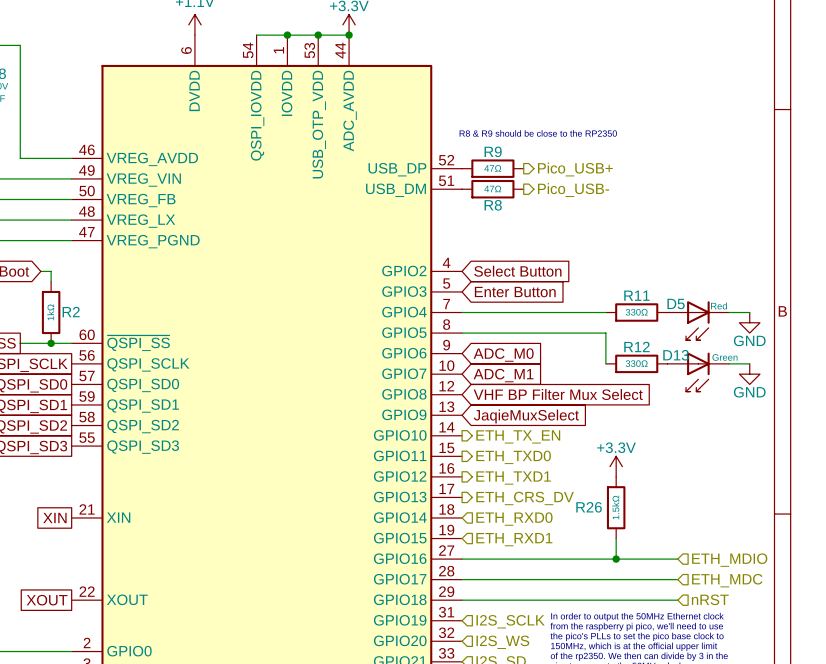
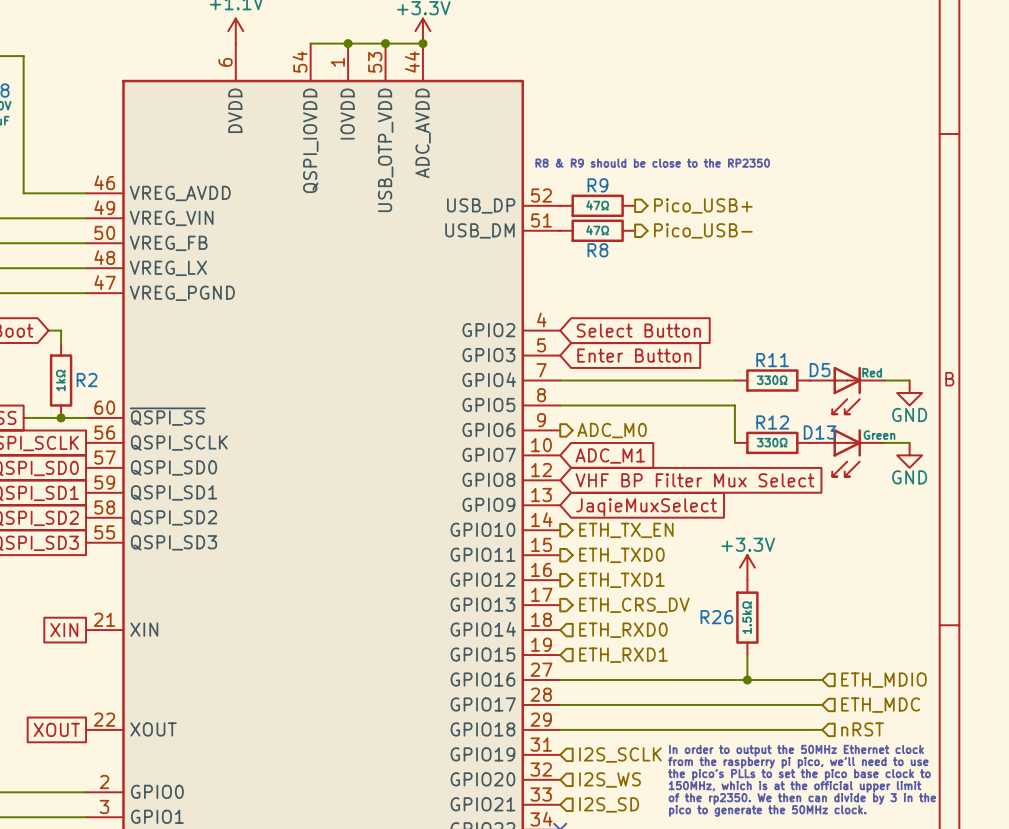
hierarchical label: none -> ADC_M0 (612, 430)
global label: ADC_M0 (503, 355) -> none

